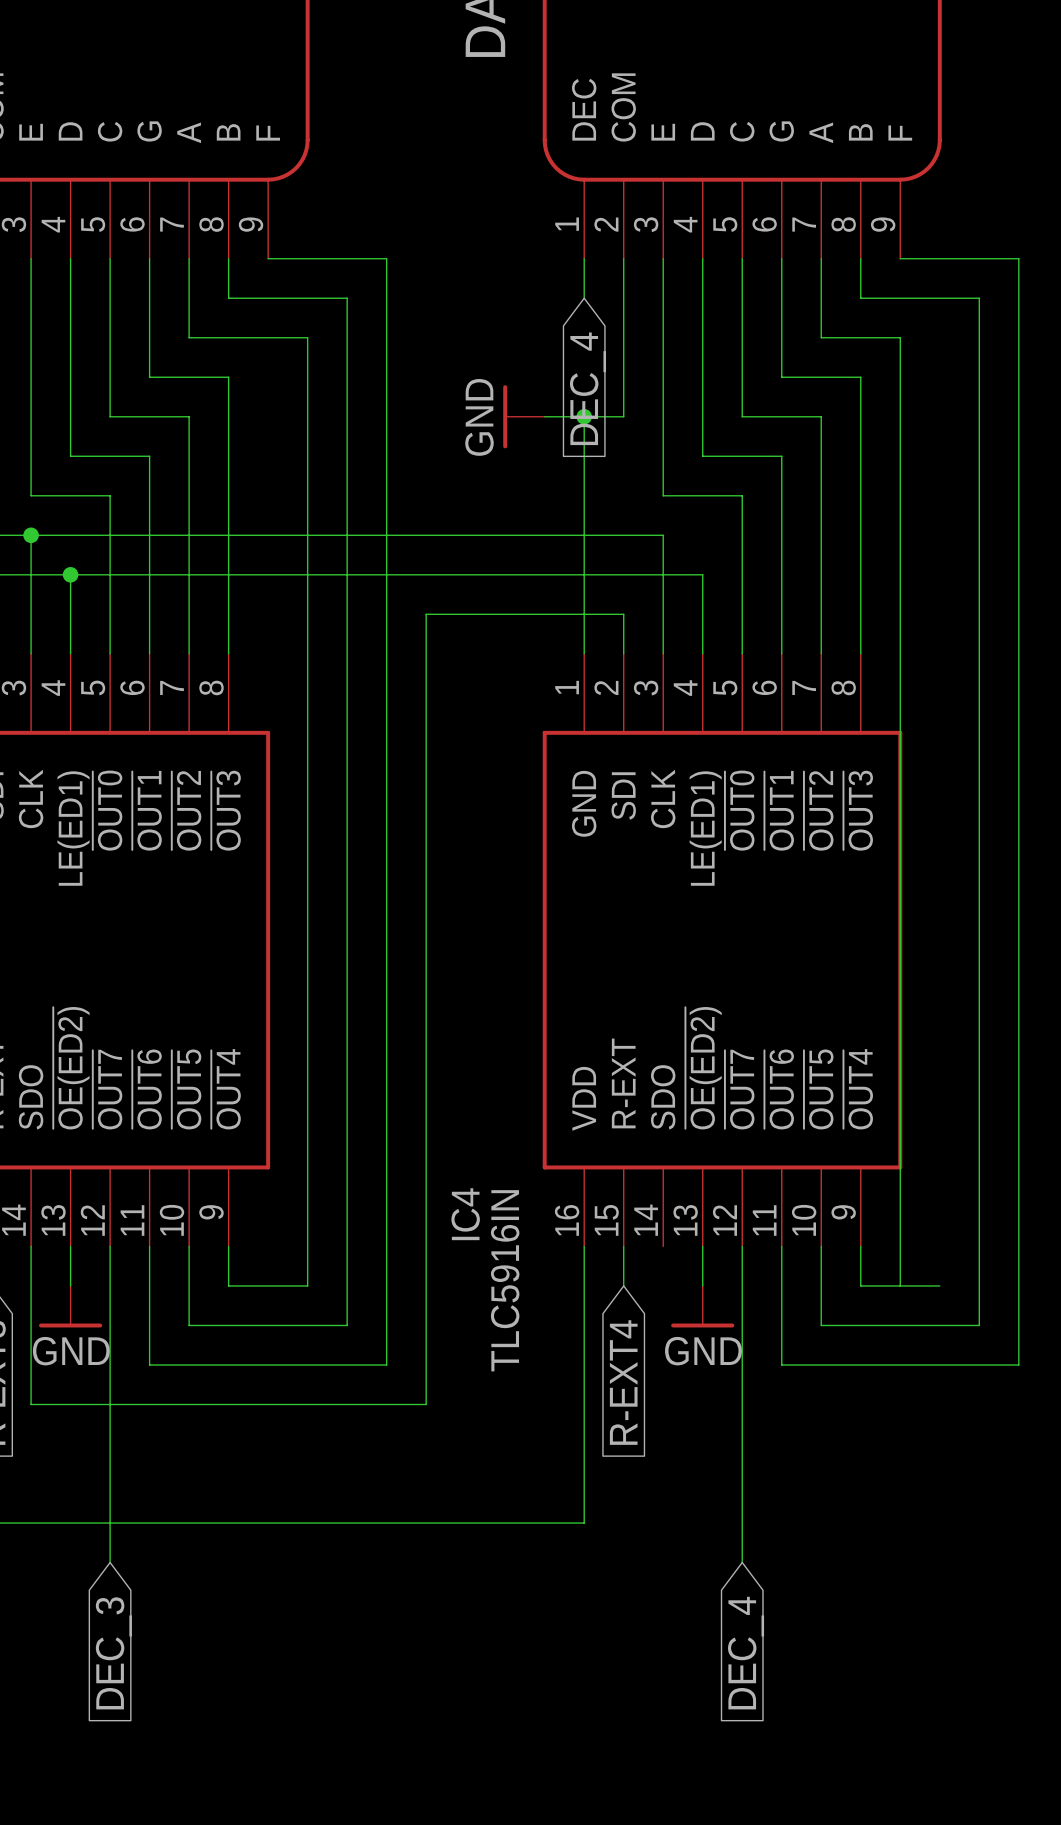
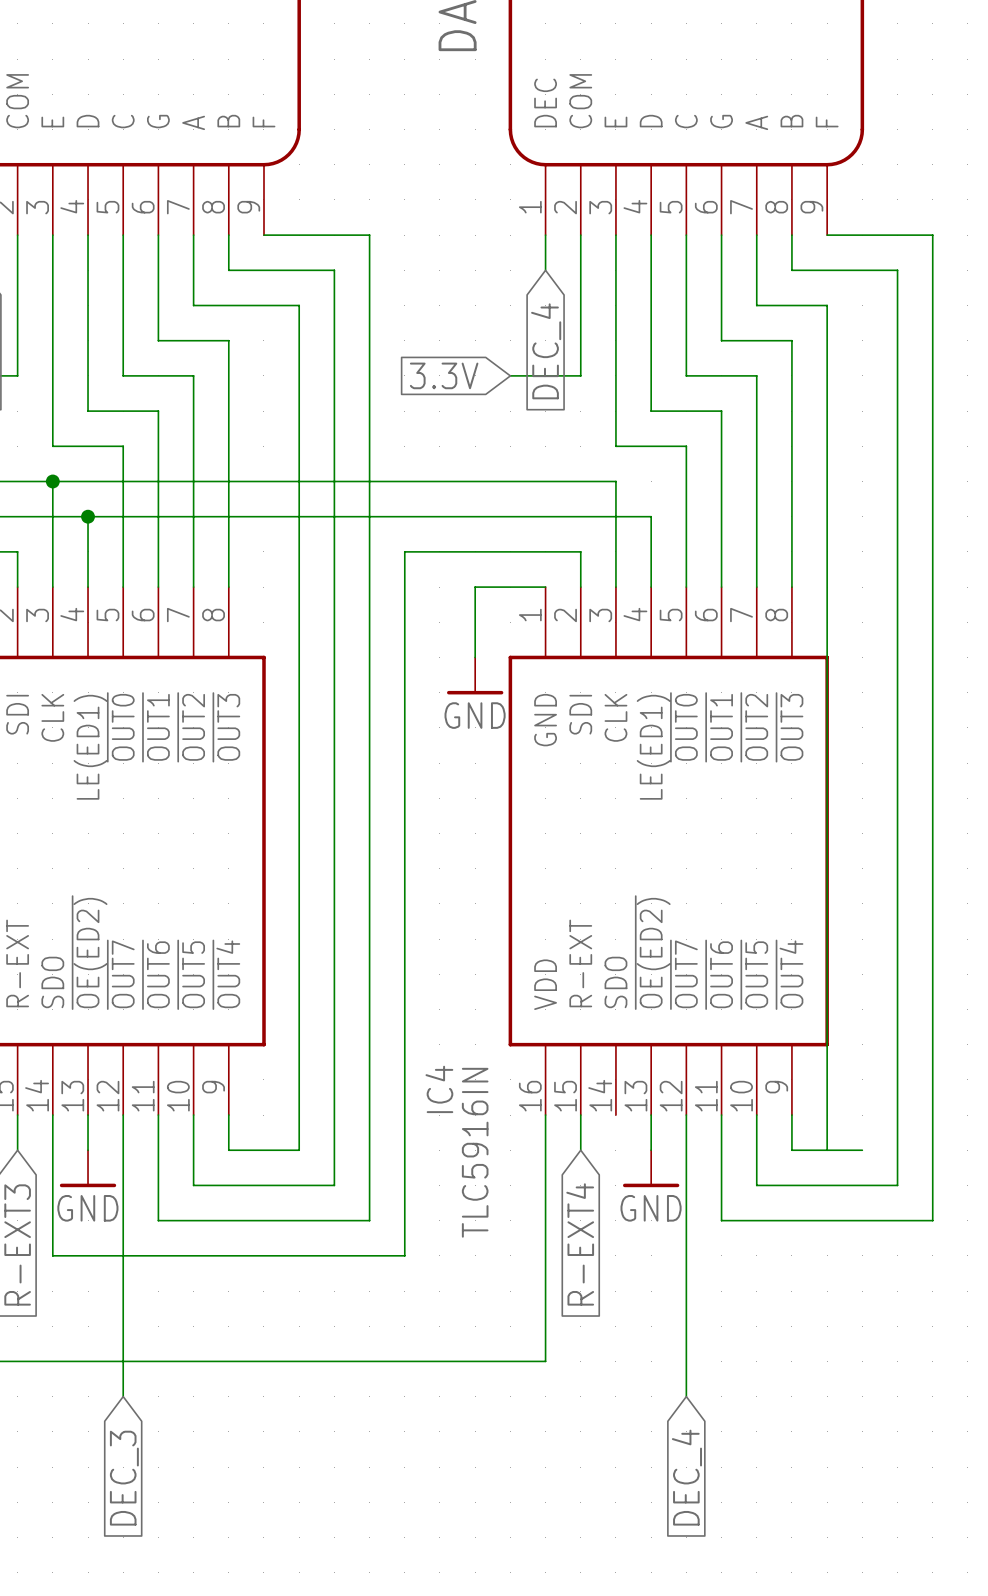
global label: none -> 3.3V (444, 375)
power symbol rotation: 0° (505, 416) -> 90° counterclockwise (475, 692)
power symbol position: GND (523, 416) -> GND (475, 675)
wire: (584, 416) (584, 653) -> (475, 657) (475, 587) (545, 587)
junction: (584, 416) -> none

